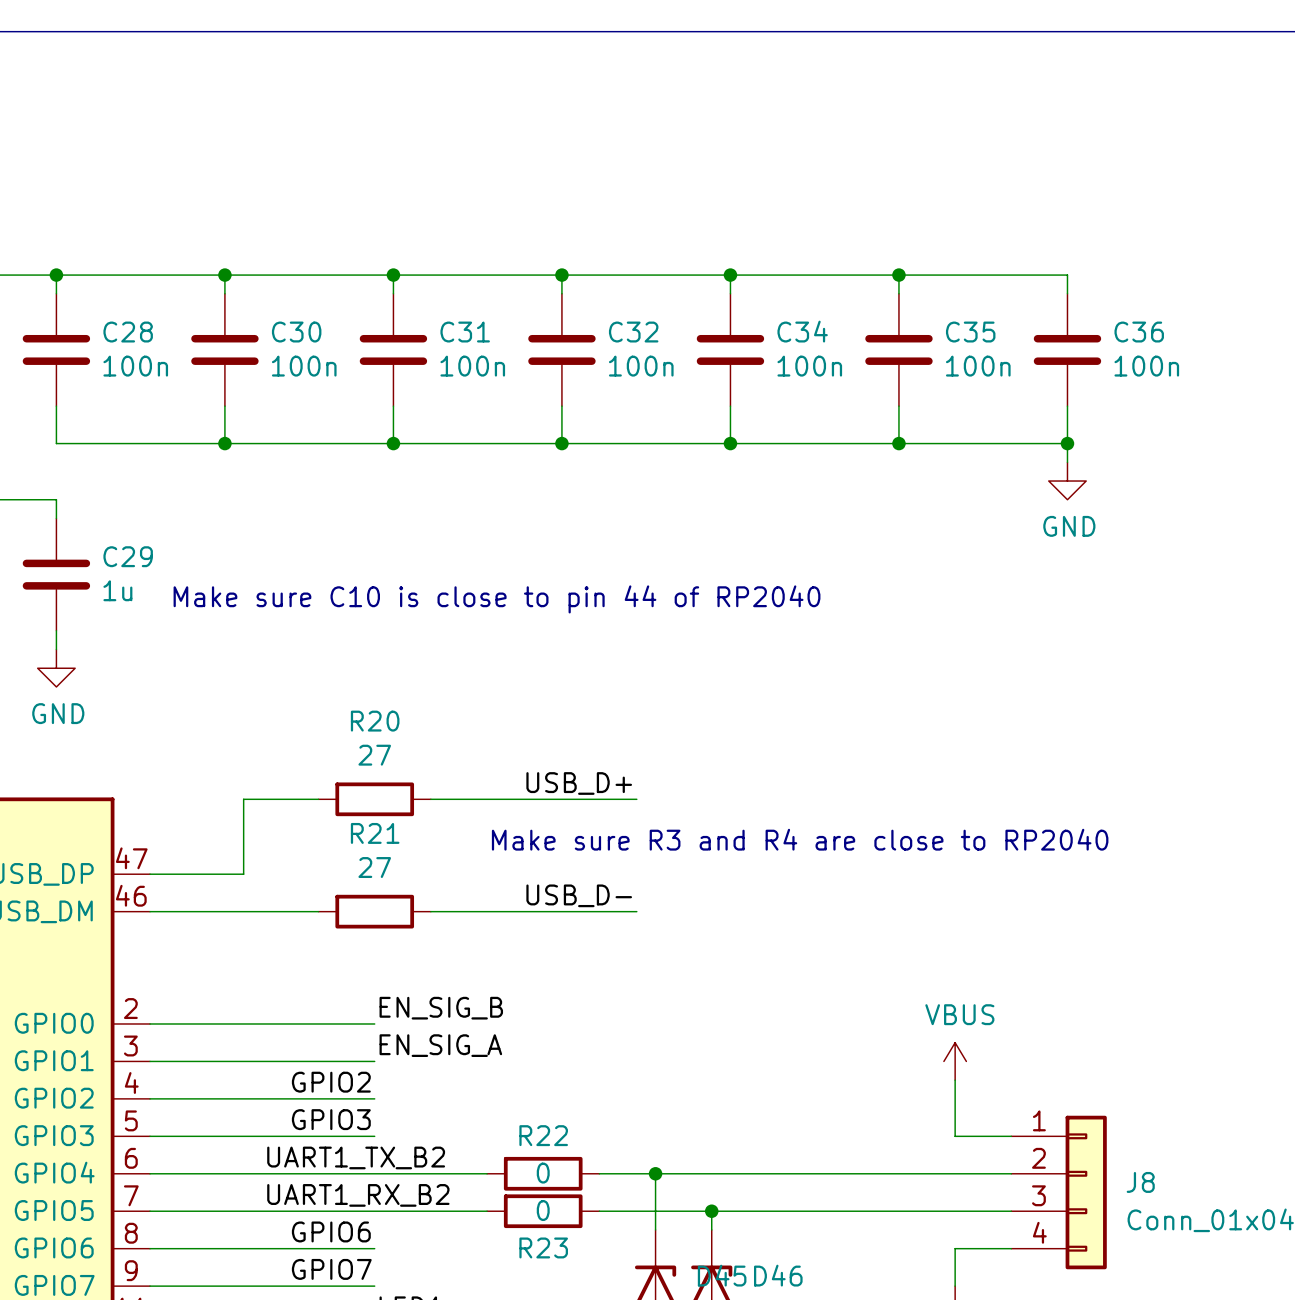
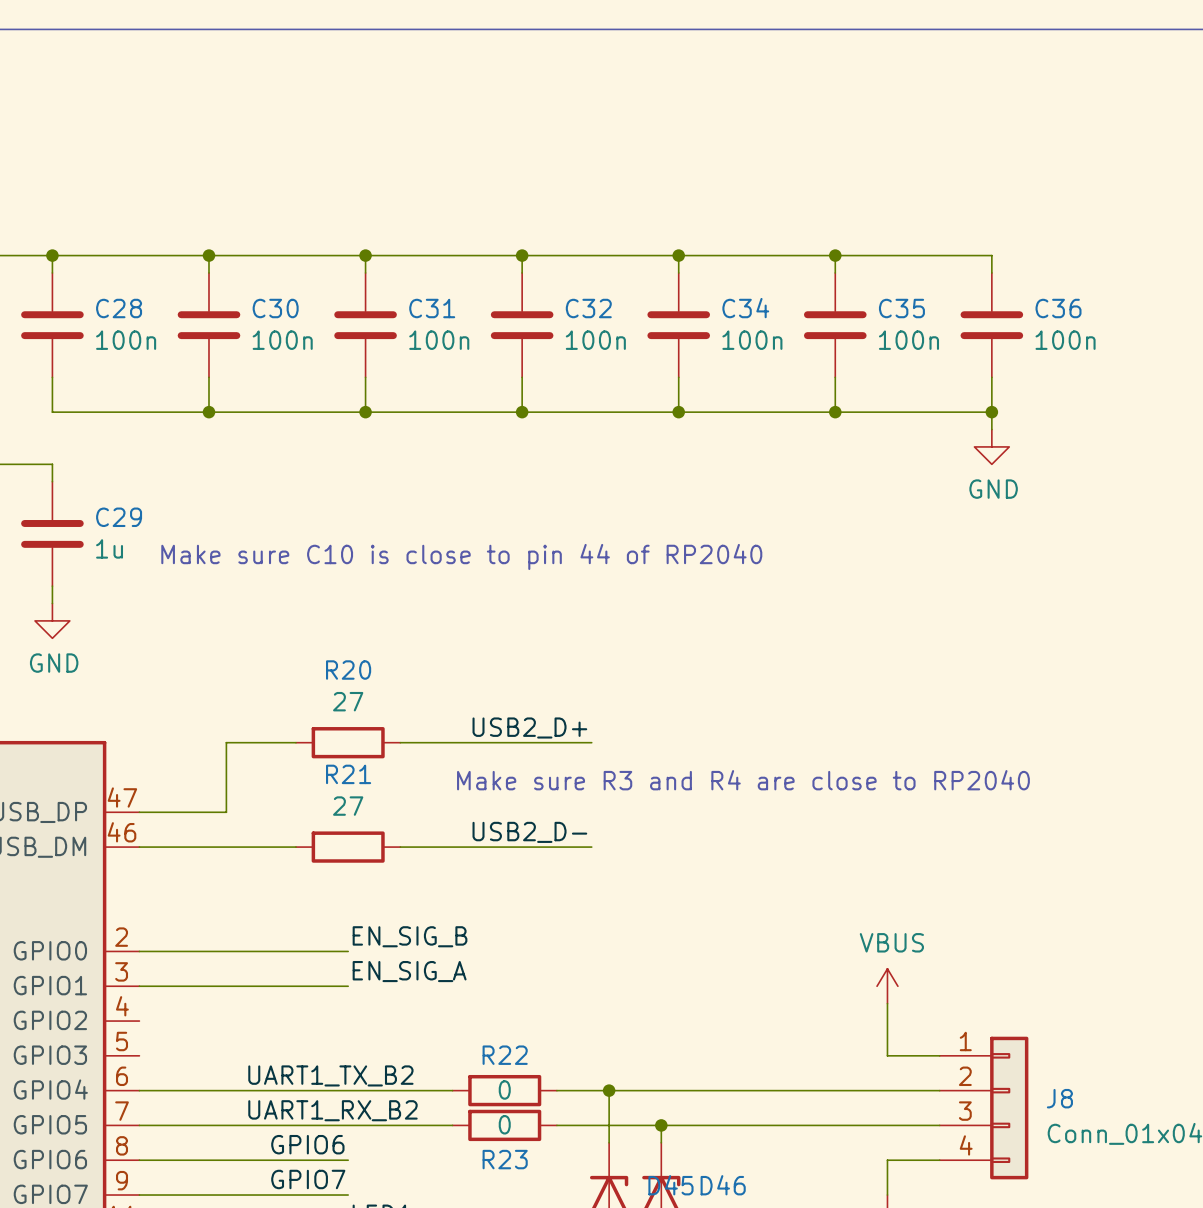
label: USB_D+ (579, 783) -> USB2_D+ (529, 727)
label: USB_D- (579, 895) -> USB2_D- (529, 832)
label: GPIO2 (331, 1082) -> none
wire: (150, 1098) (374, 1098) -> none
label: GPIO3 (331, 1119) -> none
wire: (150, 1136) (374, 1136) -> none

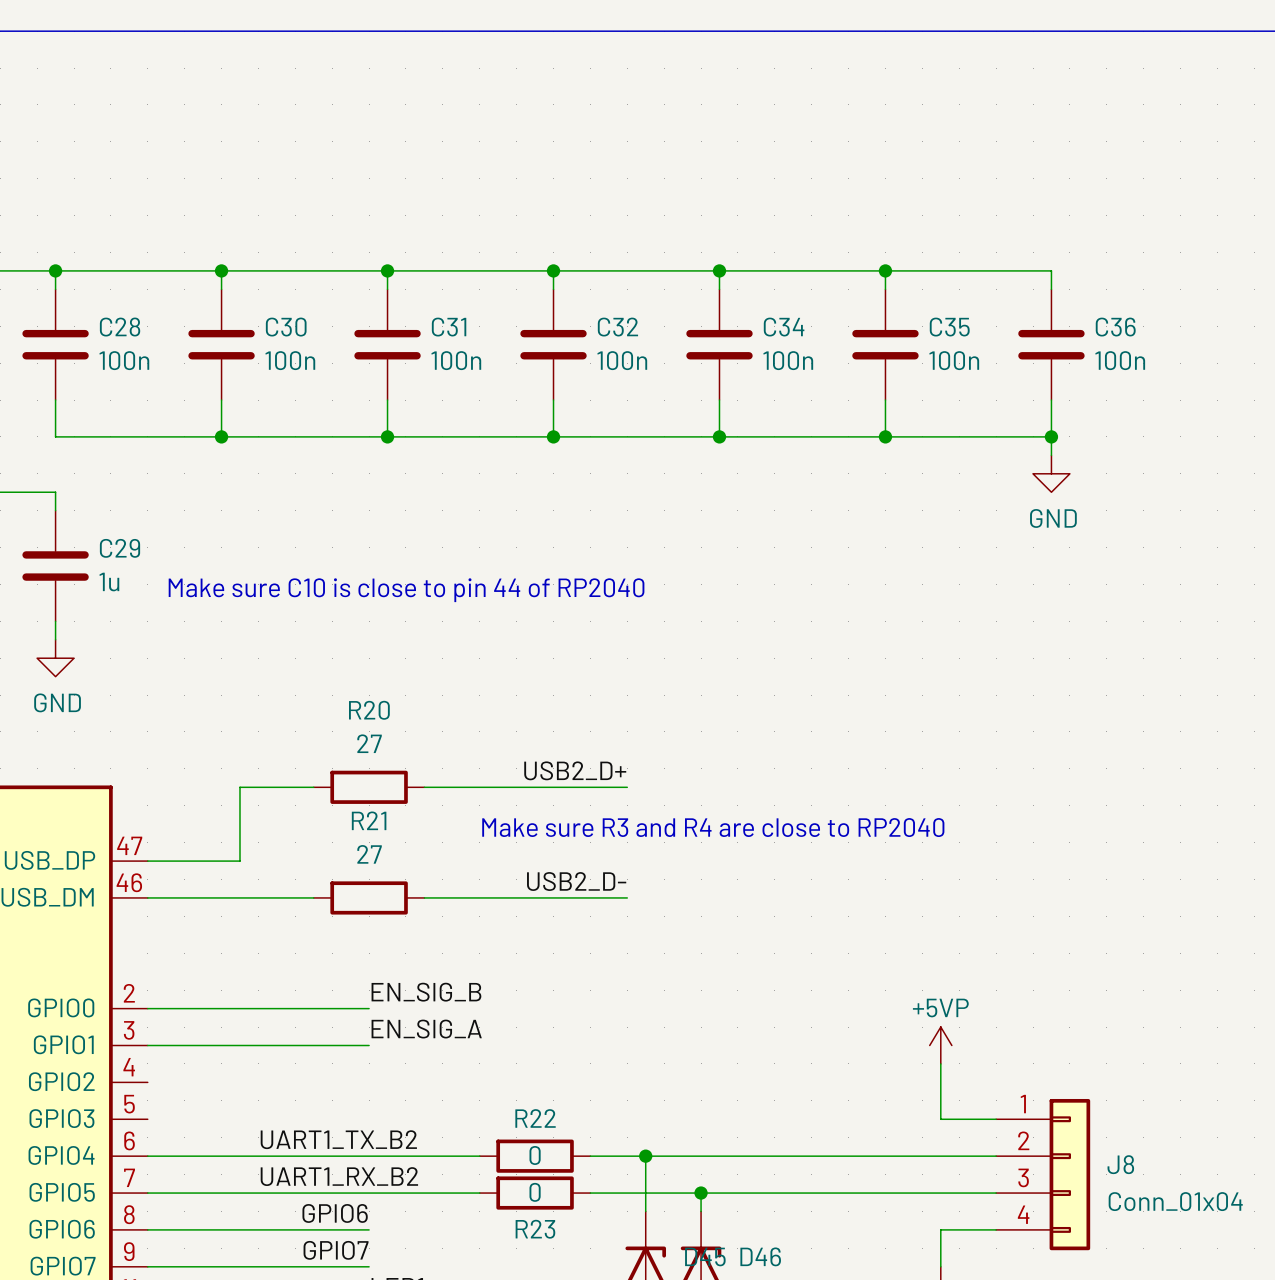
power symbol: VBUS (887, 986) -> +5VP (940, 1045)

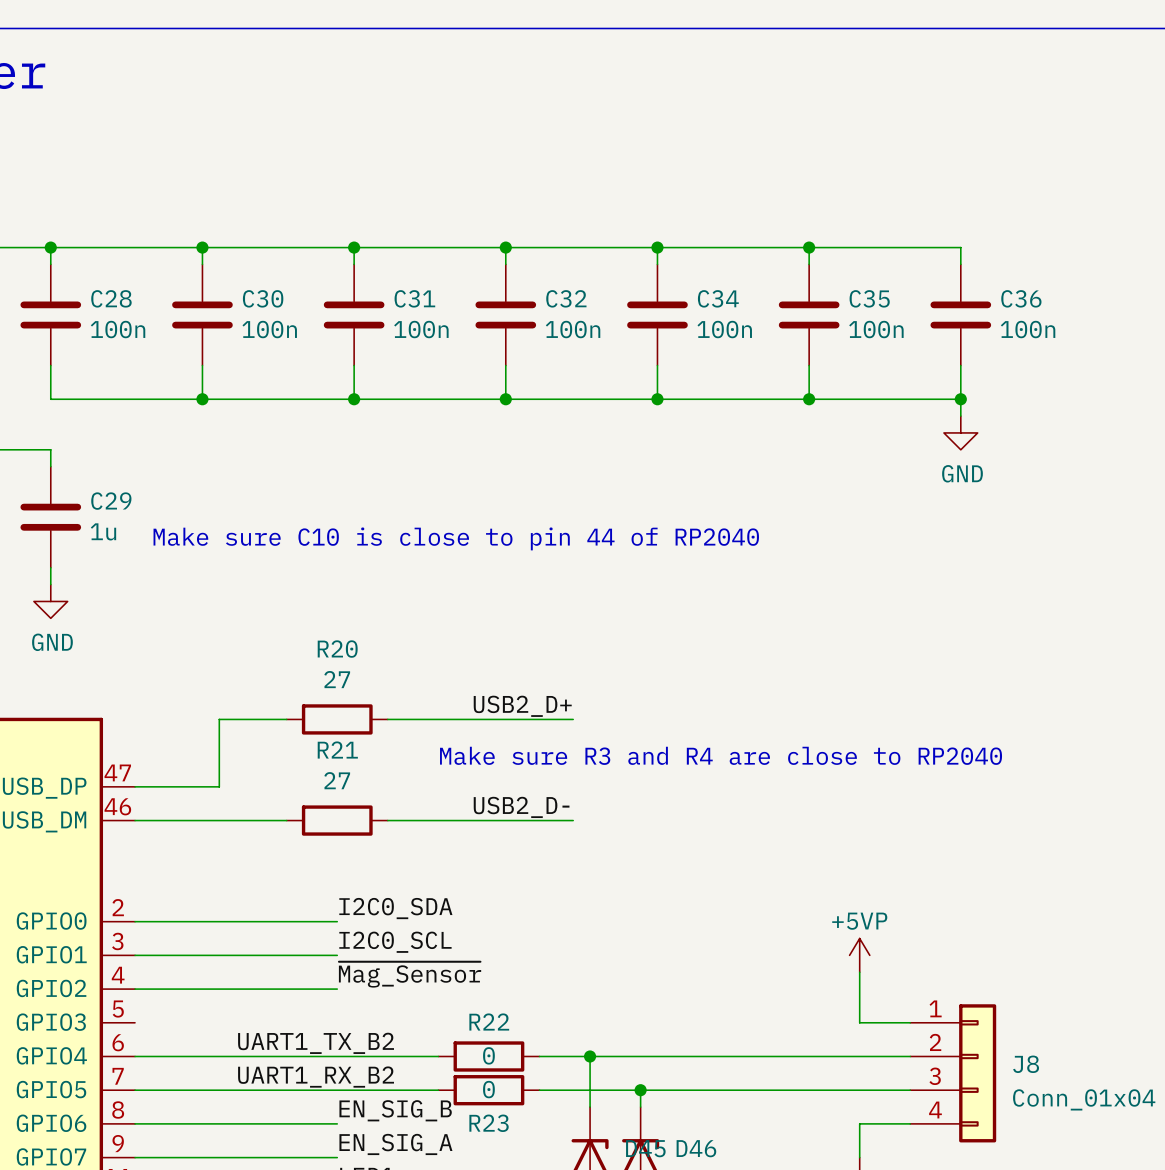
label: EN_SIG_B (426, 992) -> I2C0_SDA (395, 908)
label: EN_SIG_A (426, 1029) -> I2C0_SCL (395, 942)
label: none -> ~{Mag_Sensor} (410, 974)
wire: none -> (135, 989) (337, 989)
label: GPIO6 (335, 1213) -> EN_SIG_B (395, 1110)
label: GPIO7 (336, 1250) -> EN_SIG_A (395, 1144)

